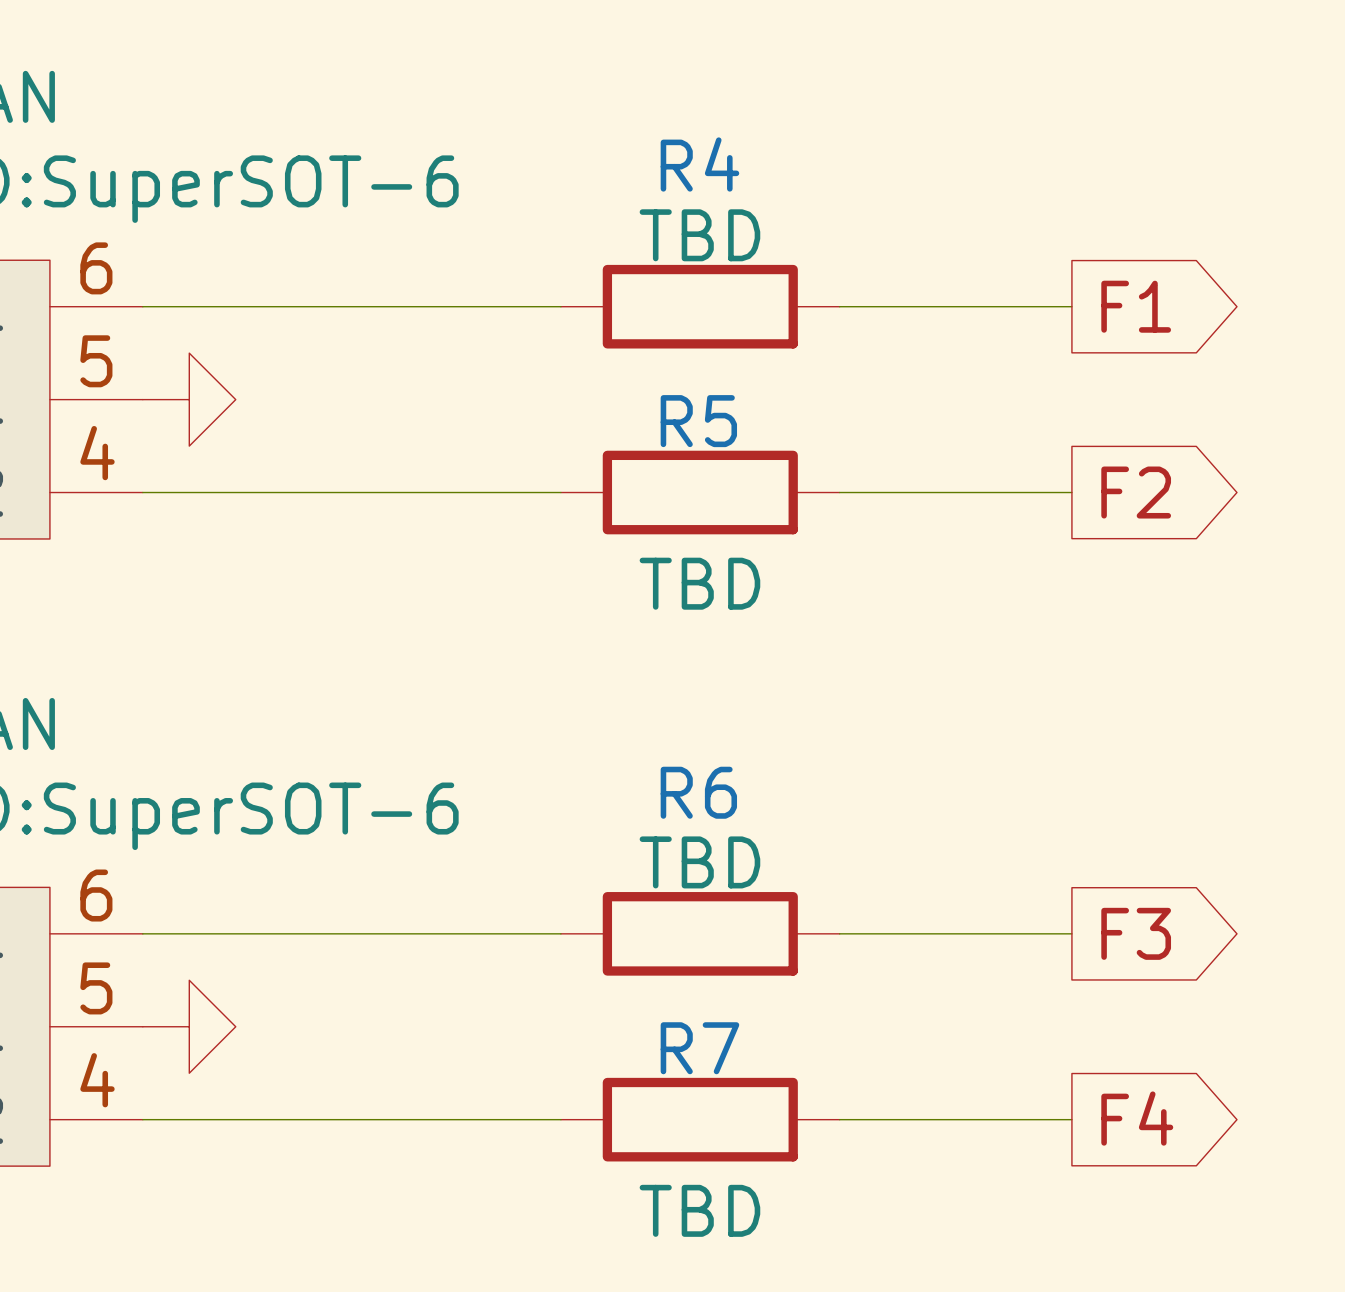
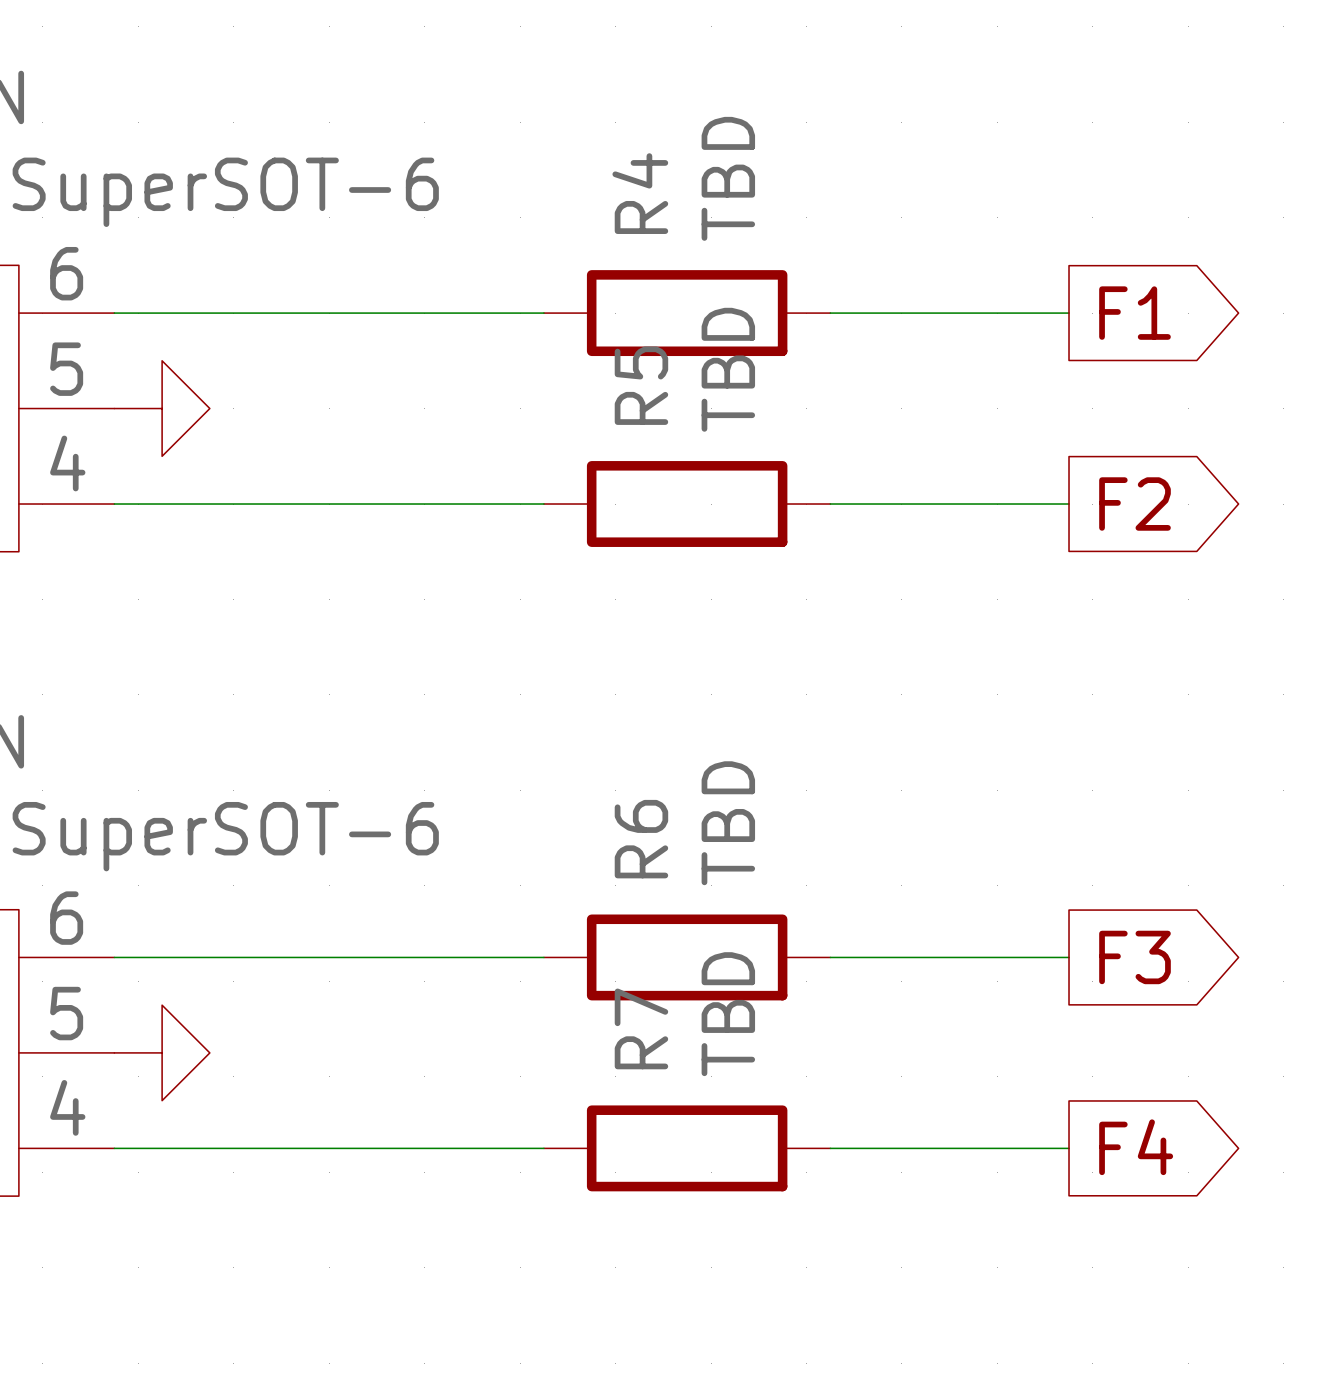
R4 name rotation: 0° (699, 164) -> 90° counterclockwise (640, 193)
R4 value rotation: 0° (699, 235) -> 90° counterclockwise (728, 178)
R5 name rotation: 0° (698, 421) -> 90° counterclockwise (641, 385)
R5 value rotation: 0° (699, 583) -> 90° counterclockwise (728, 369)
R5 value position: TBD (699, 583) -> TBD (728, 369)
R6 name rotation: 0° (698, 792) -> 90° counterclockwise (641, 839)
R6 value rotation: 0° (699, 862) -> 90° counterclockwise (728, 823)
R7 name rotation: 0° (699, 1048) -> 90° counterclockwise (641, 1028)
R7 value rotation: 0° (699, 1210) -> 90° counterclockwise (728, 1014)
R7 value position: TBD (699, 1210) -> TBD (728, 1014)

